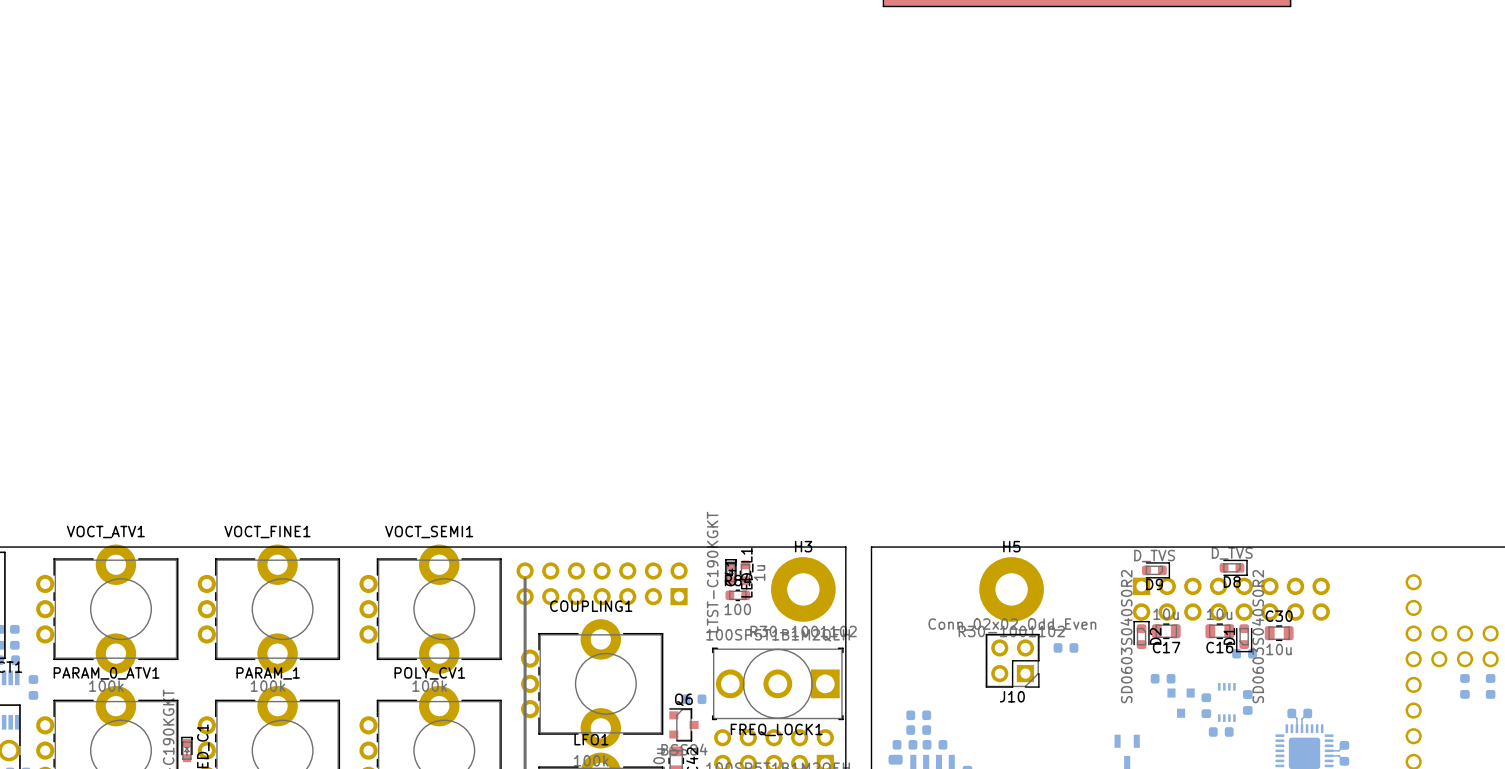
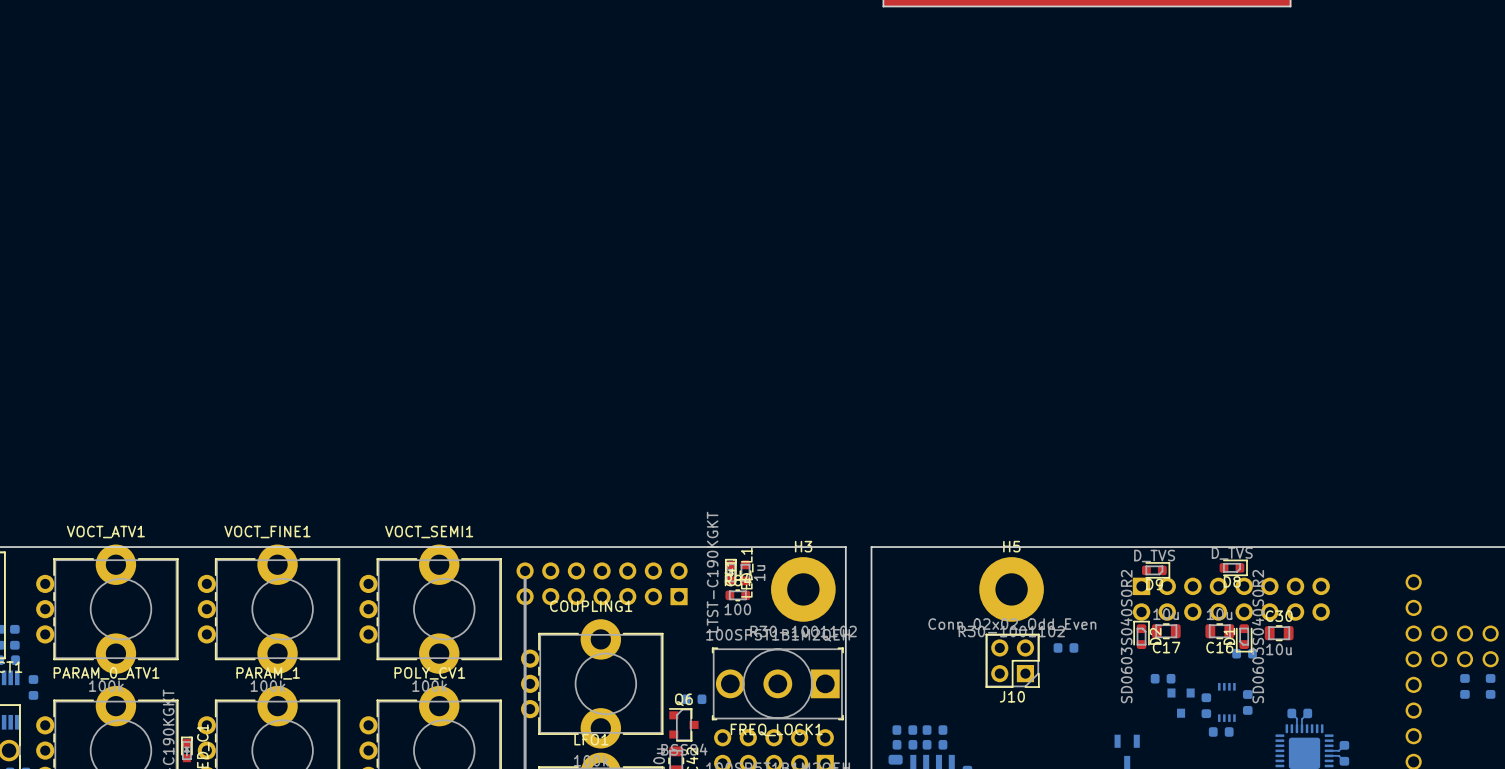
part: (918, 715) -> none
part: none -> (904, 730)
part: (918, 730) -> none
part: none -> (934, 730)

